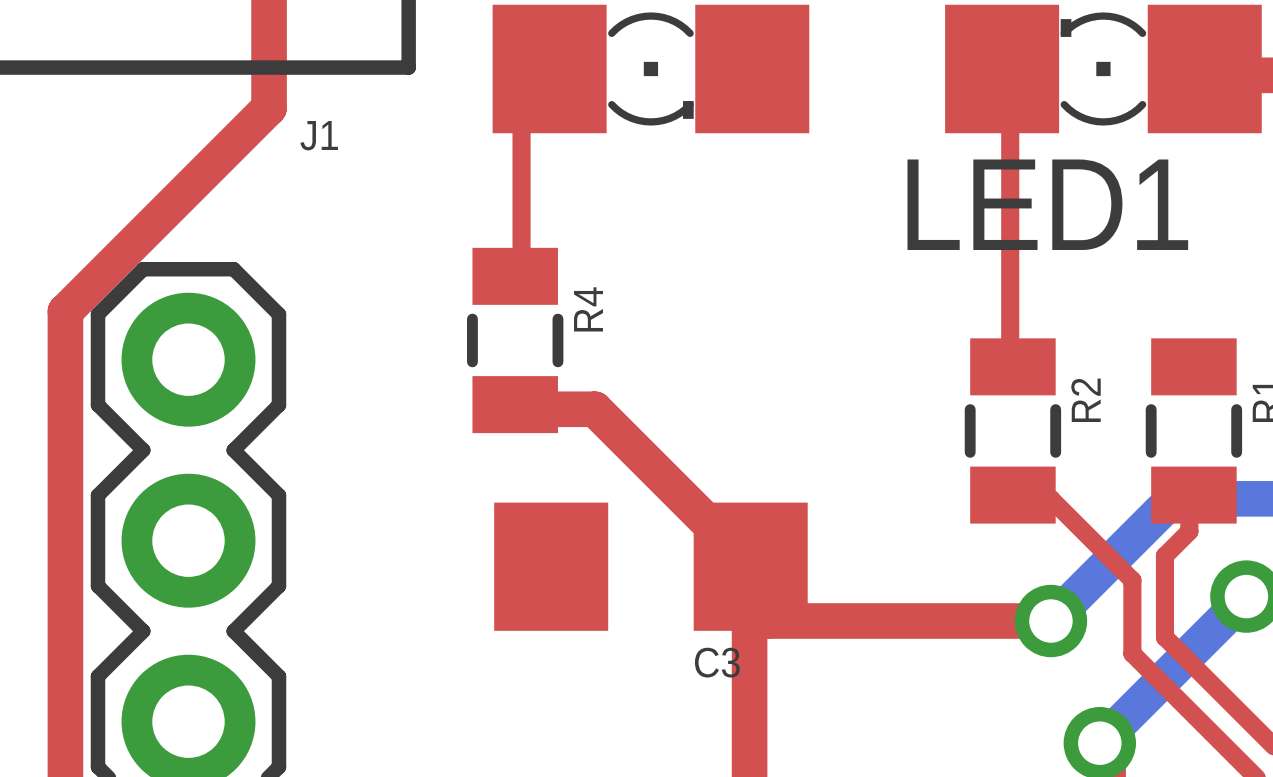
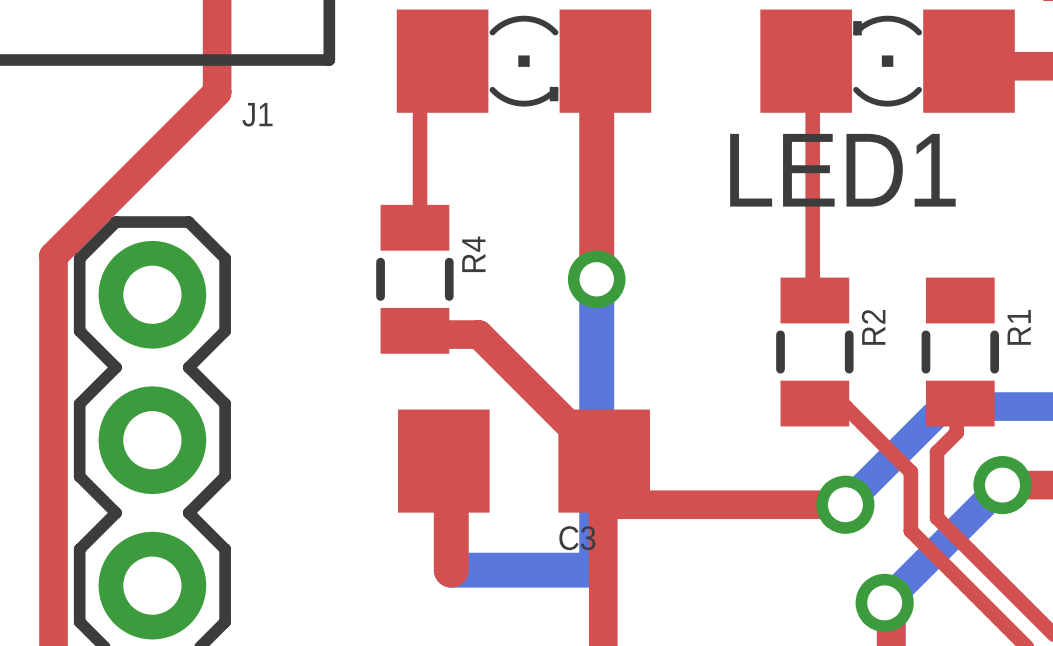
top track: none -> (596, 61) (605, 61) (596, 69) (596, 279)
bottom track: none -> (596, 279) (596, 570) (451, 570)
via: none -> (596, 279)
top track: none -> (443, 461) (451, 461) (451, 570)

